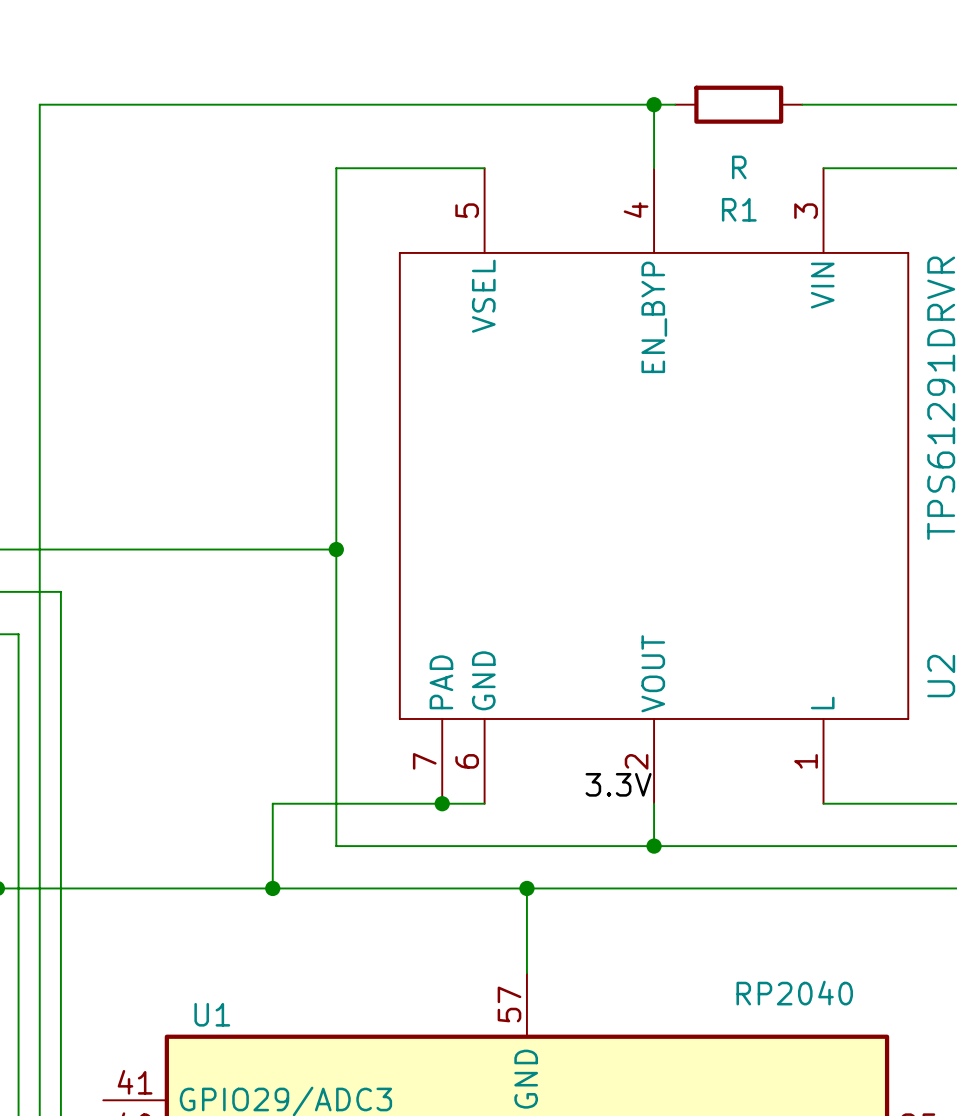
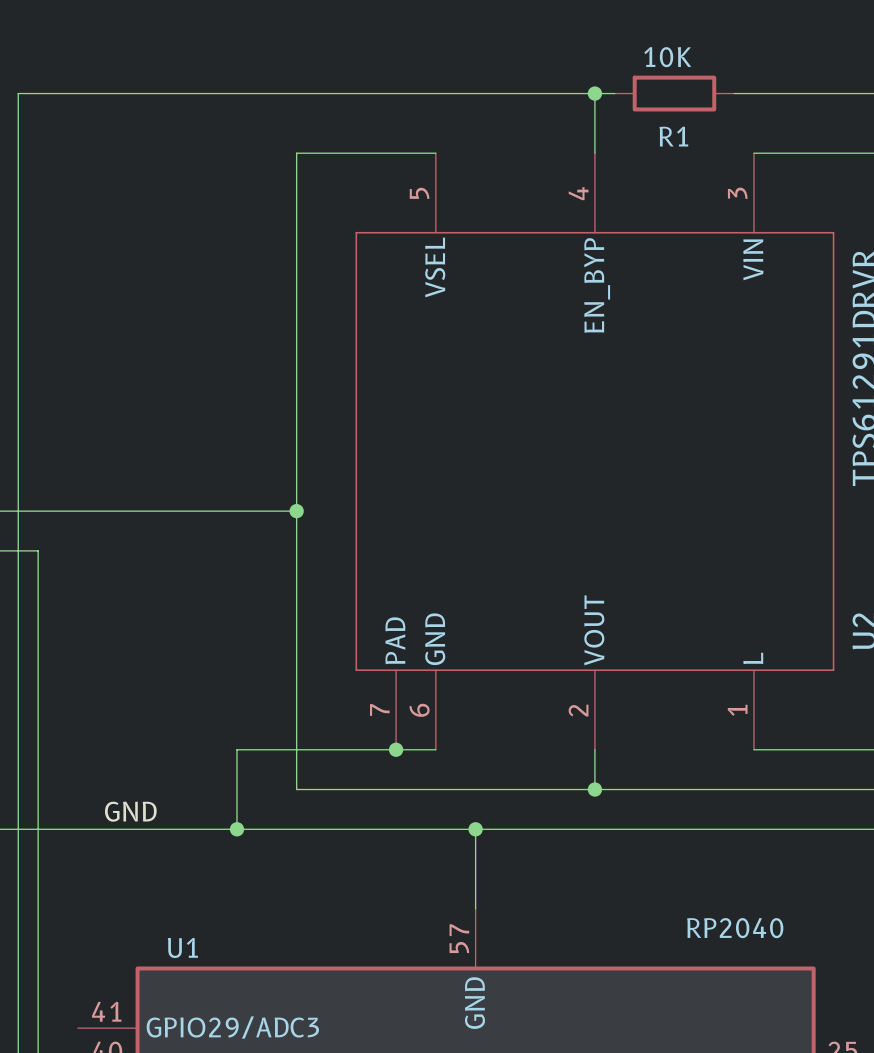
R1 value: R (739, 167) -> 10K (667, 57)
R1 name position: R1 (739, 209) -> R1 (673, 136)
label: 3.3V (618, 784) -> none
label: none -> GND (130, 811)

